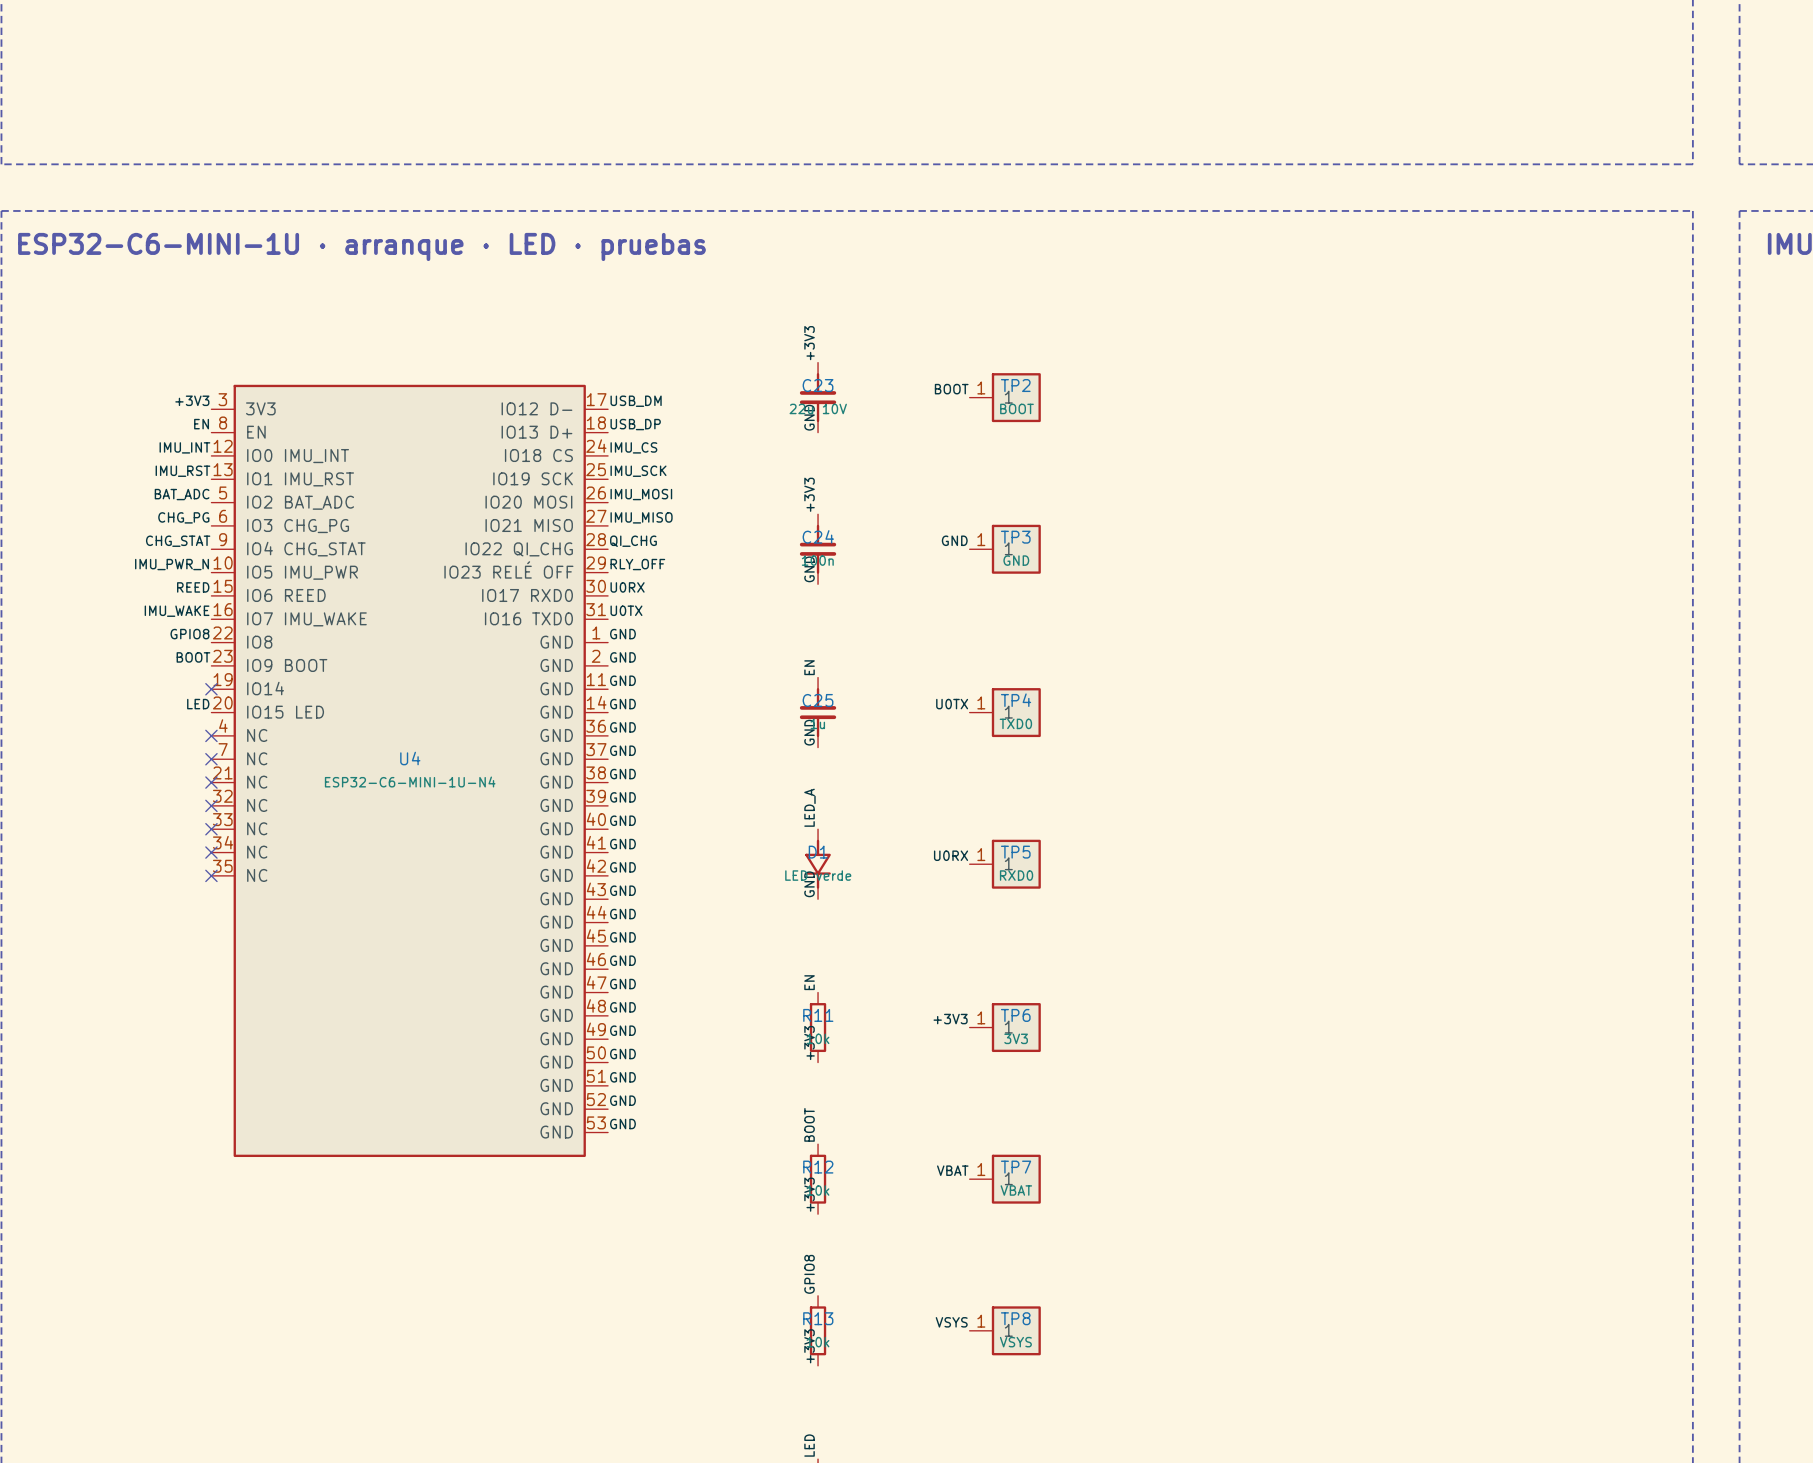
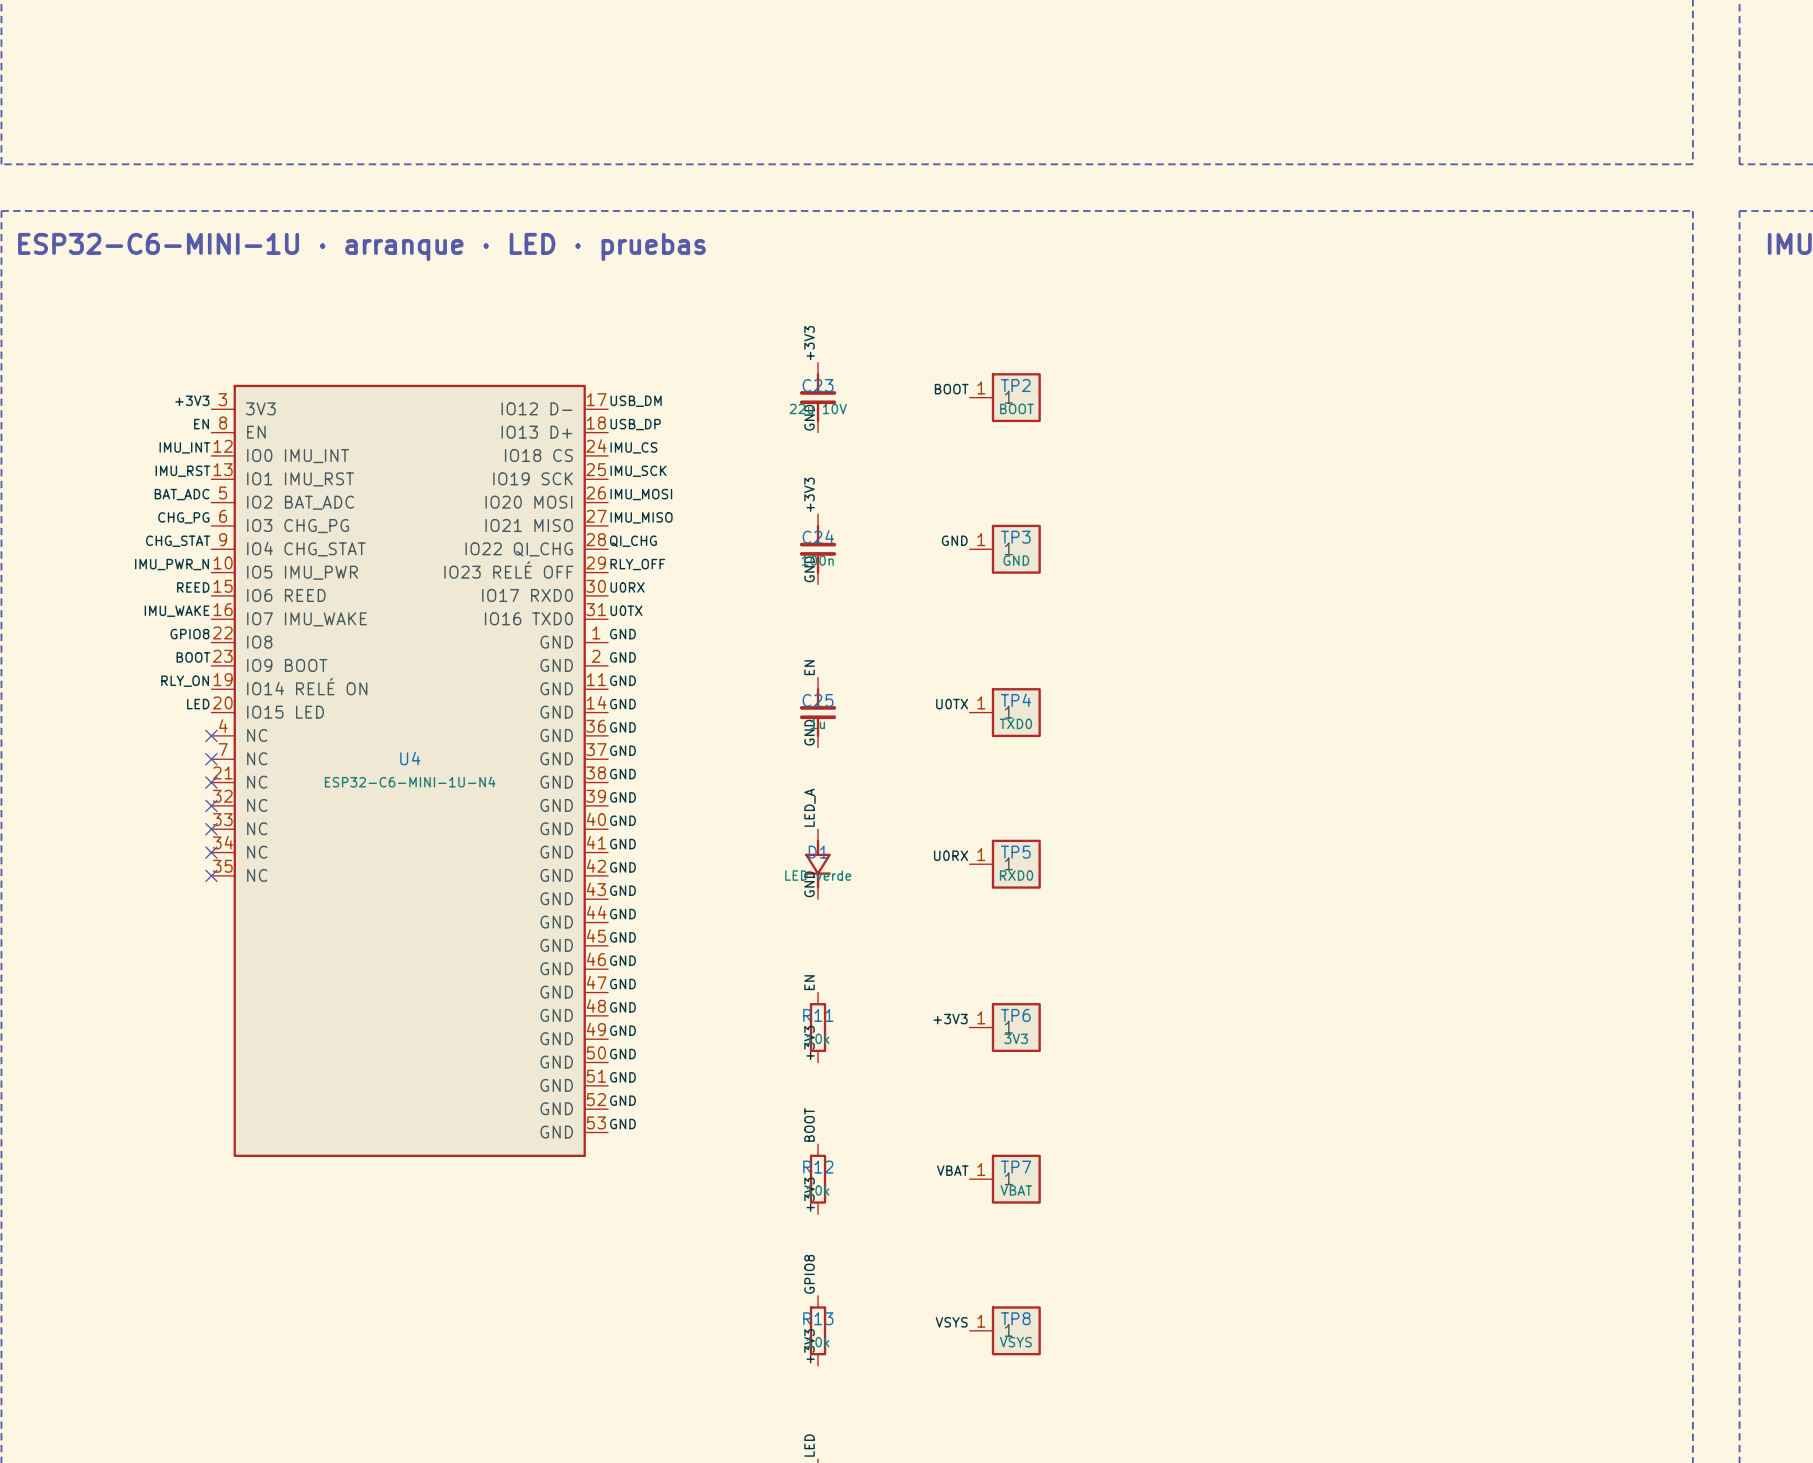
label: none -> RLY_ON (185, 681)
U4 pin name: IO14 (265, 688) -> IO14 RELÉ ON (307, 686)
no-connect mark: (211, 689) -> none

